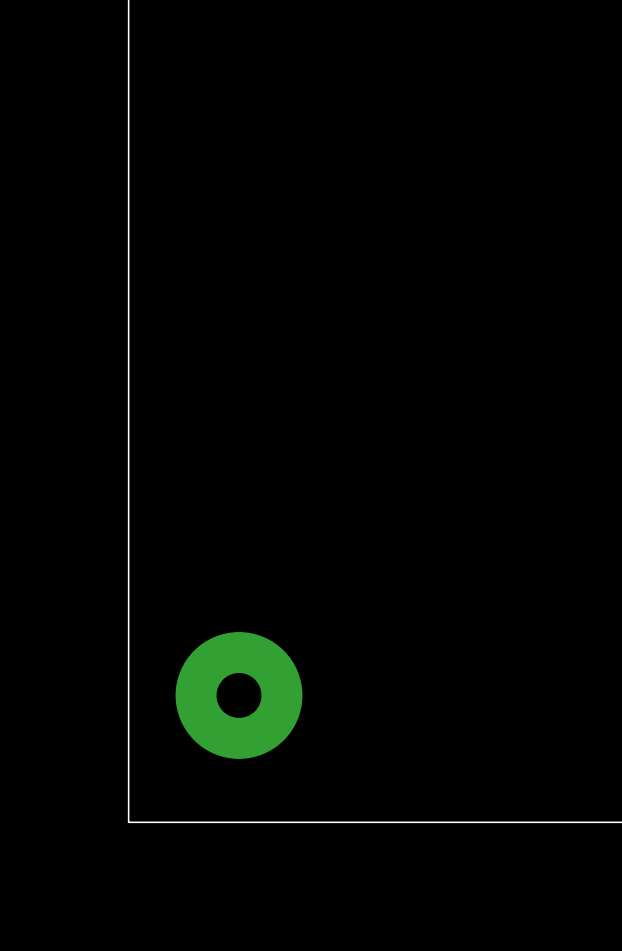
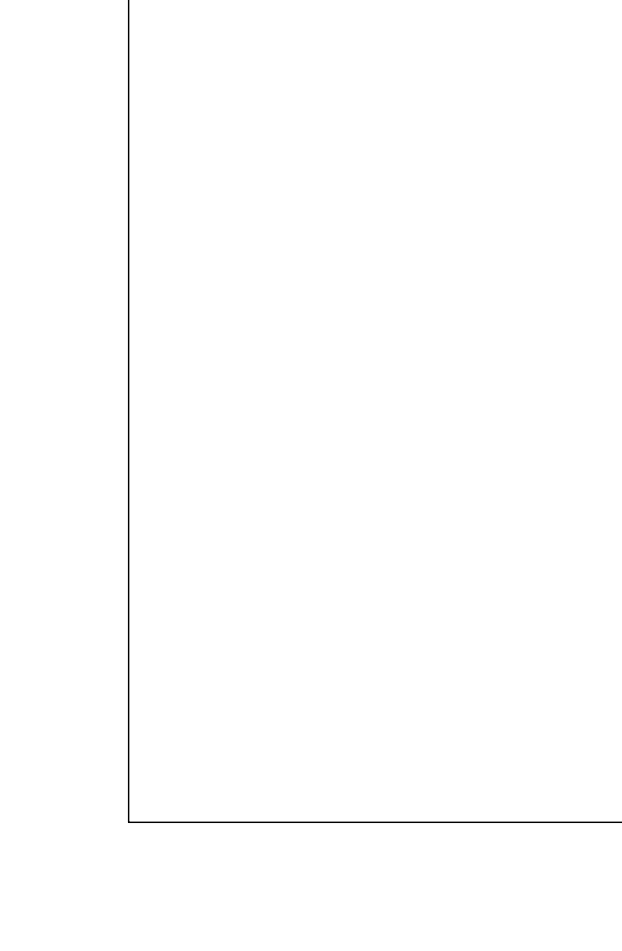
via: (239, 695) -> none

